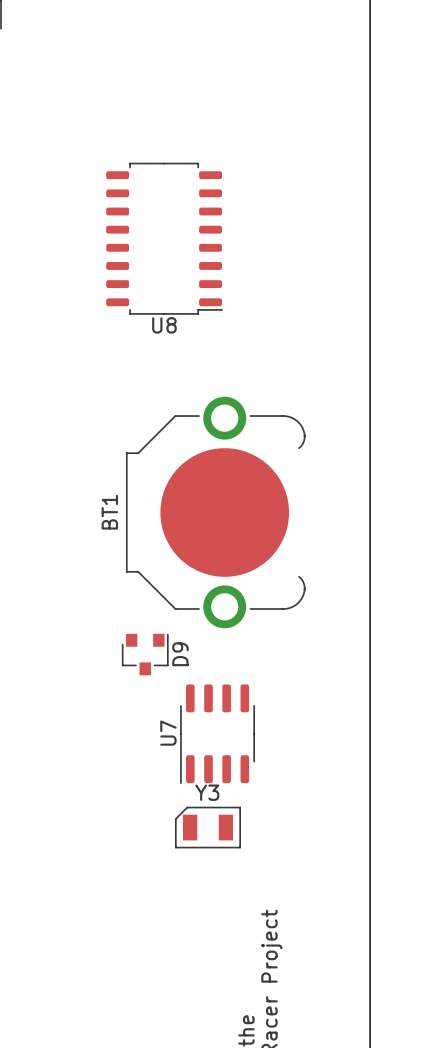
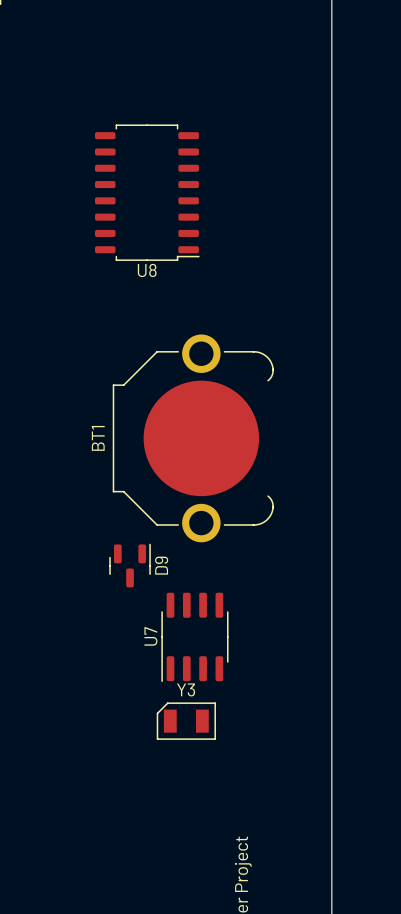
D9 footprint: [121, 633, 169, 676] -> [109, 543, 151, 588]

